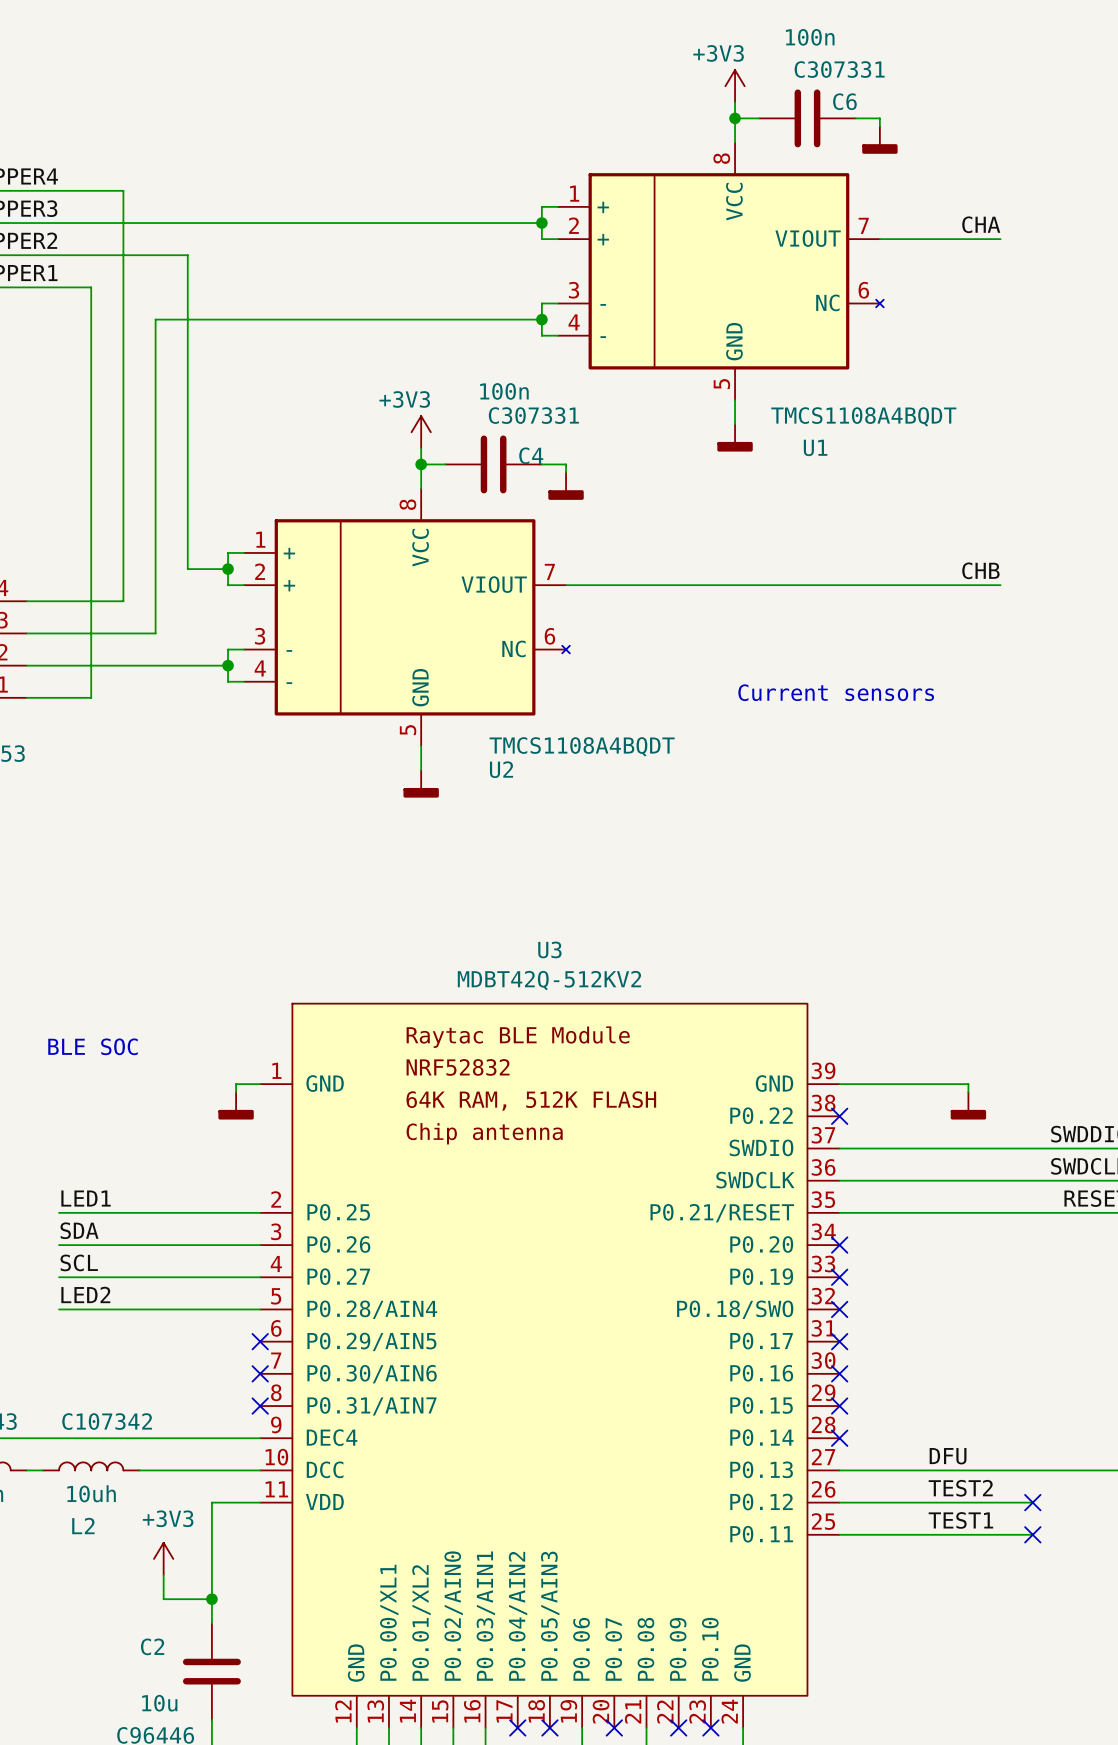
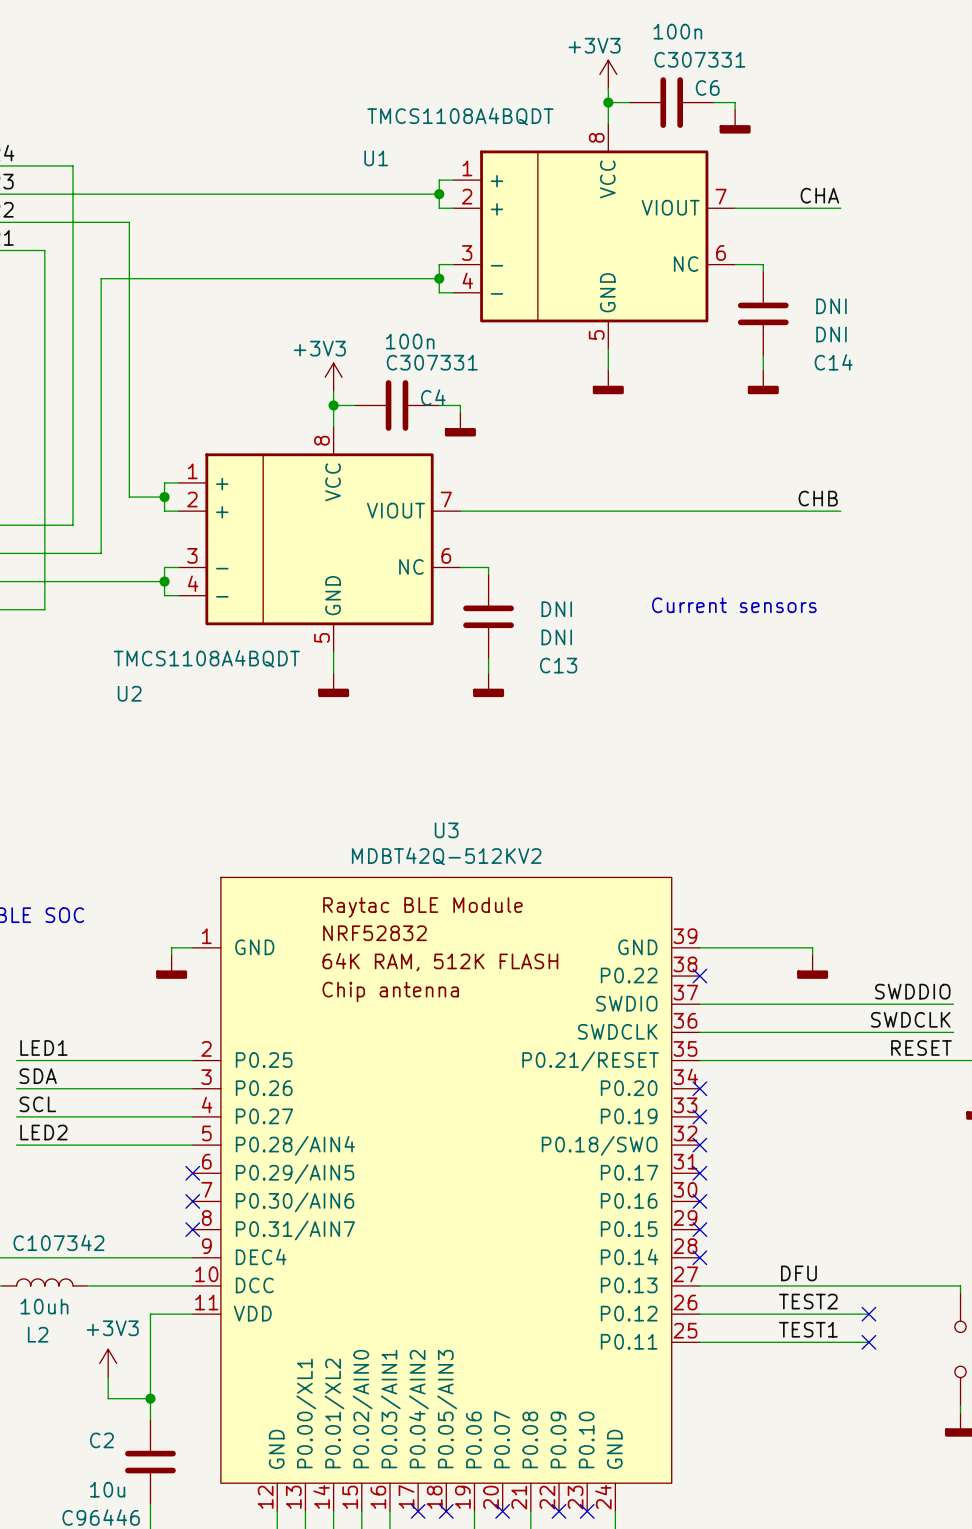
U1 symbol: [557, 142, 884, 401] -> [453, 123, 736, 350]
wire: none -> (735, 264) (763, 264) (763, 271)
C14: none -> DNI (763, 313)
wire: none -> (763, 356) (763, 370)
U1 value position: TMCS1108A4BQDT (863, 416) -> TMCS1108A4BQDT (460, 116)
power symbol: none -> (763, 382)
U1 name position: U1 (815, 447) -> U1 (376, 158)
U2 symbol: [244, 488, 570, 747] -> [178, 426, 461, 653]
wire: none -> (460, 567) (488, 567) (488, 574)
text position: Current sensors (836, 692) -> Current sensors (734, 605)
C13: none -> DNI (488, 616)
U2 value position: TMCS1108A4BQDT (582, 746) -> TMCS1108A4BQDT (206, 658)
wire: none -> (488, 659) (488, 673)
U2 name position: U2 (501, 769) -> U2 (129, 693)
power symbol: none -> (488, 685)

